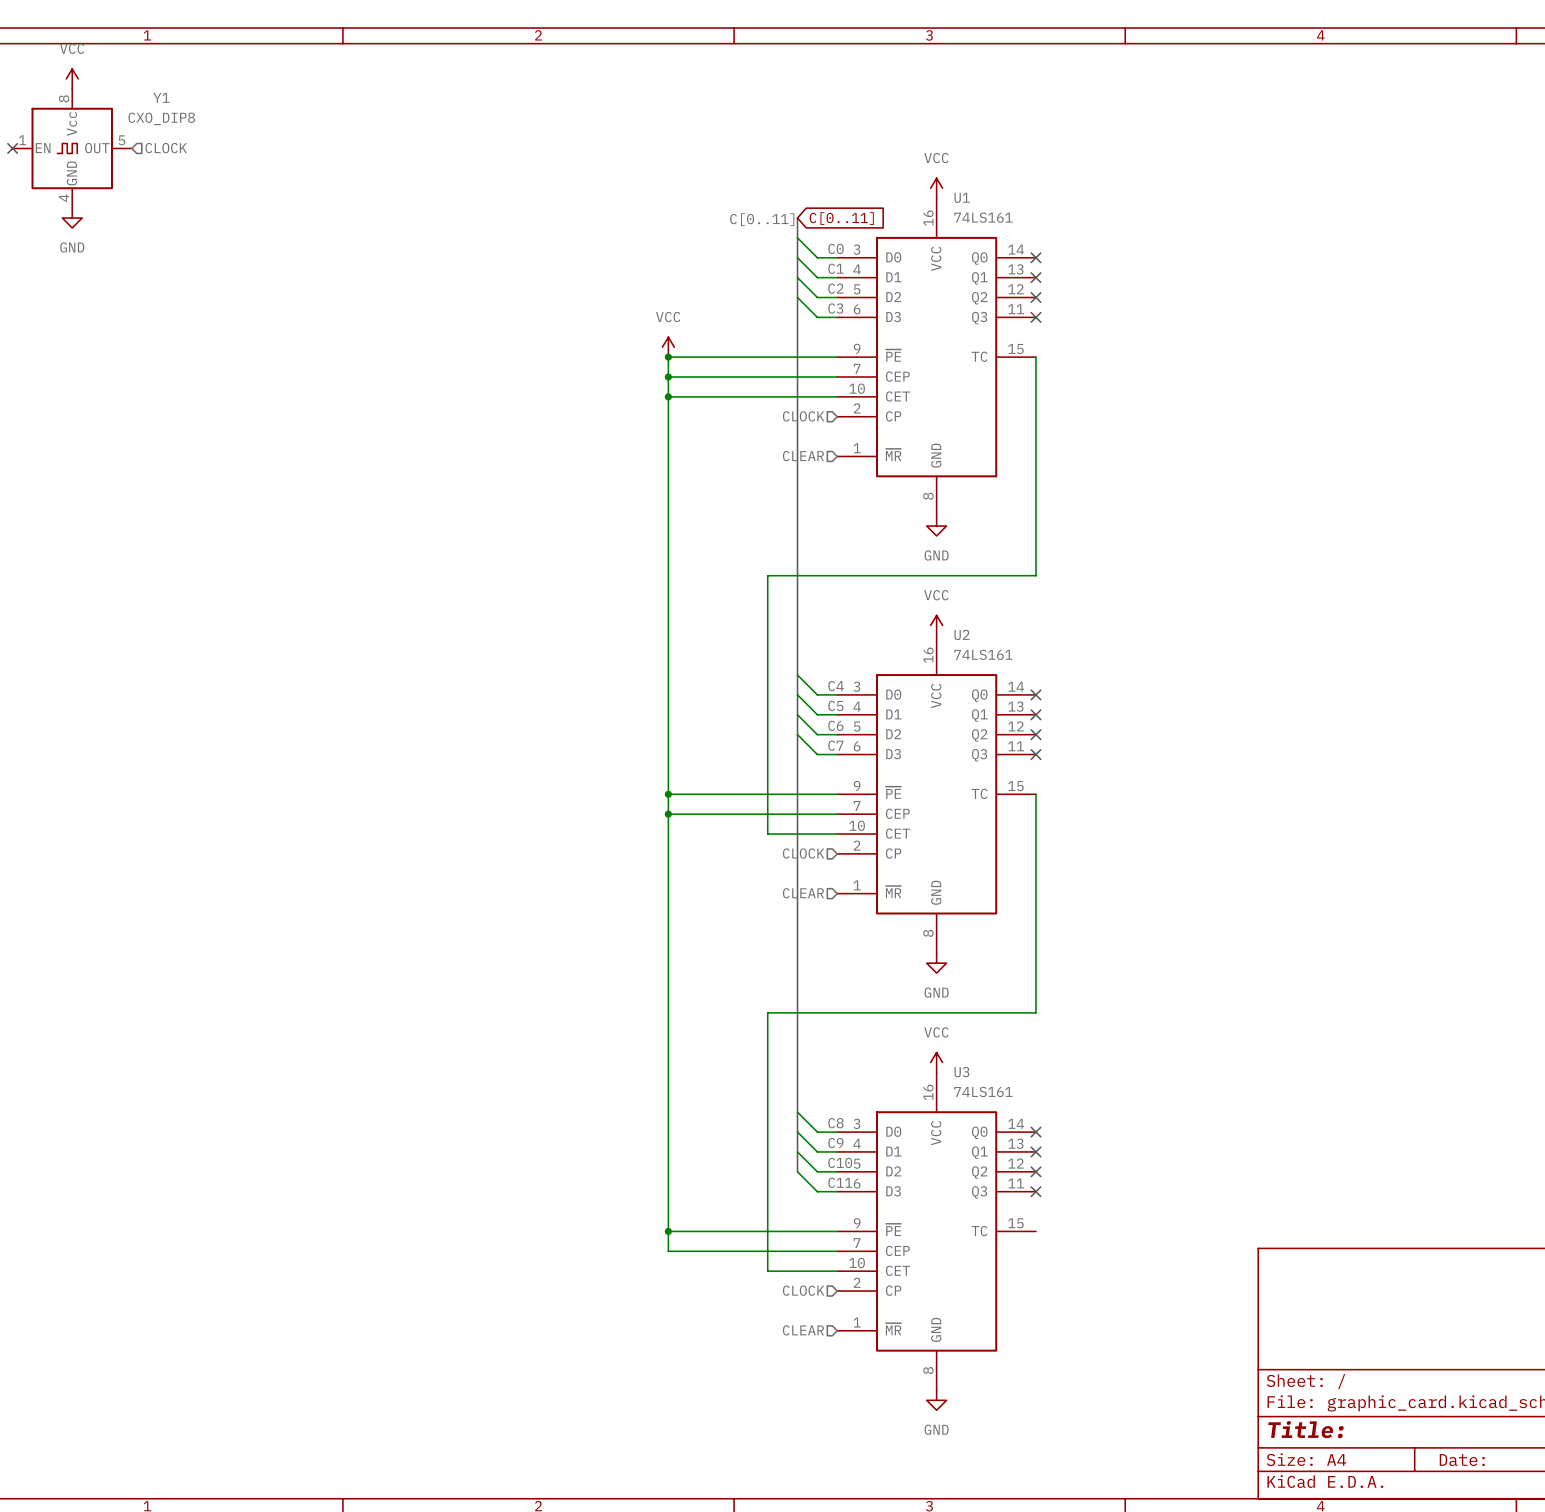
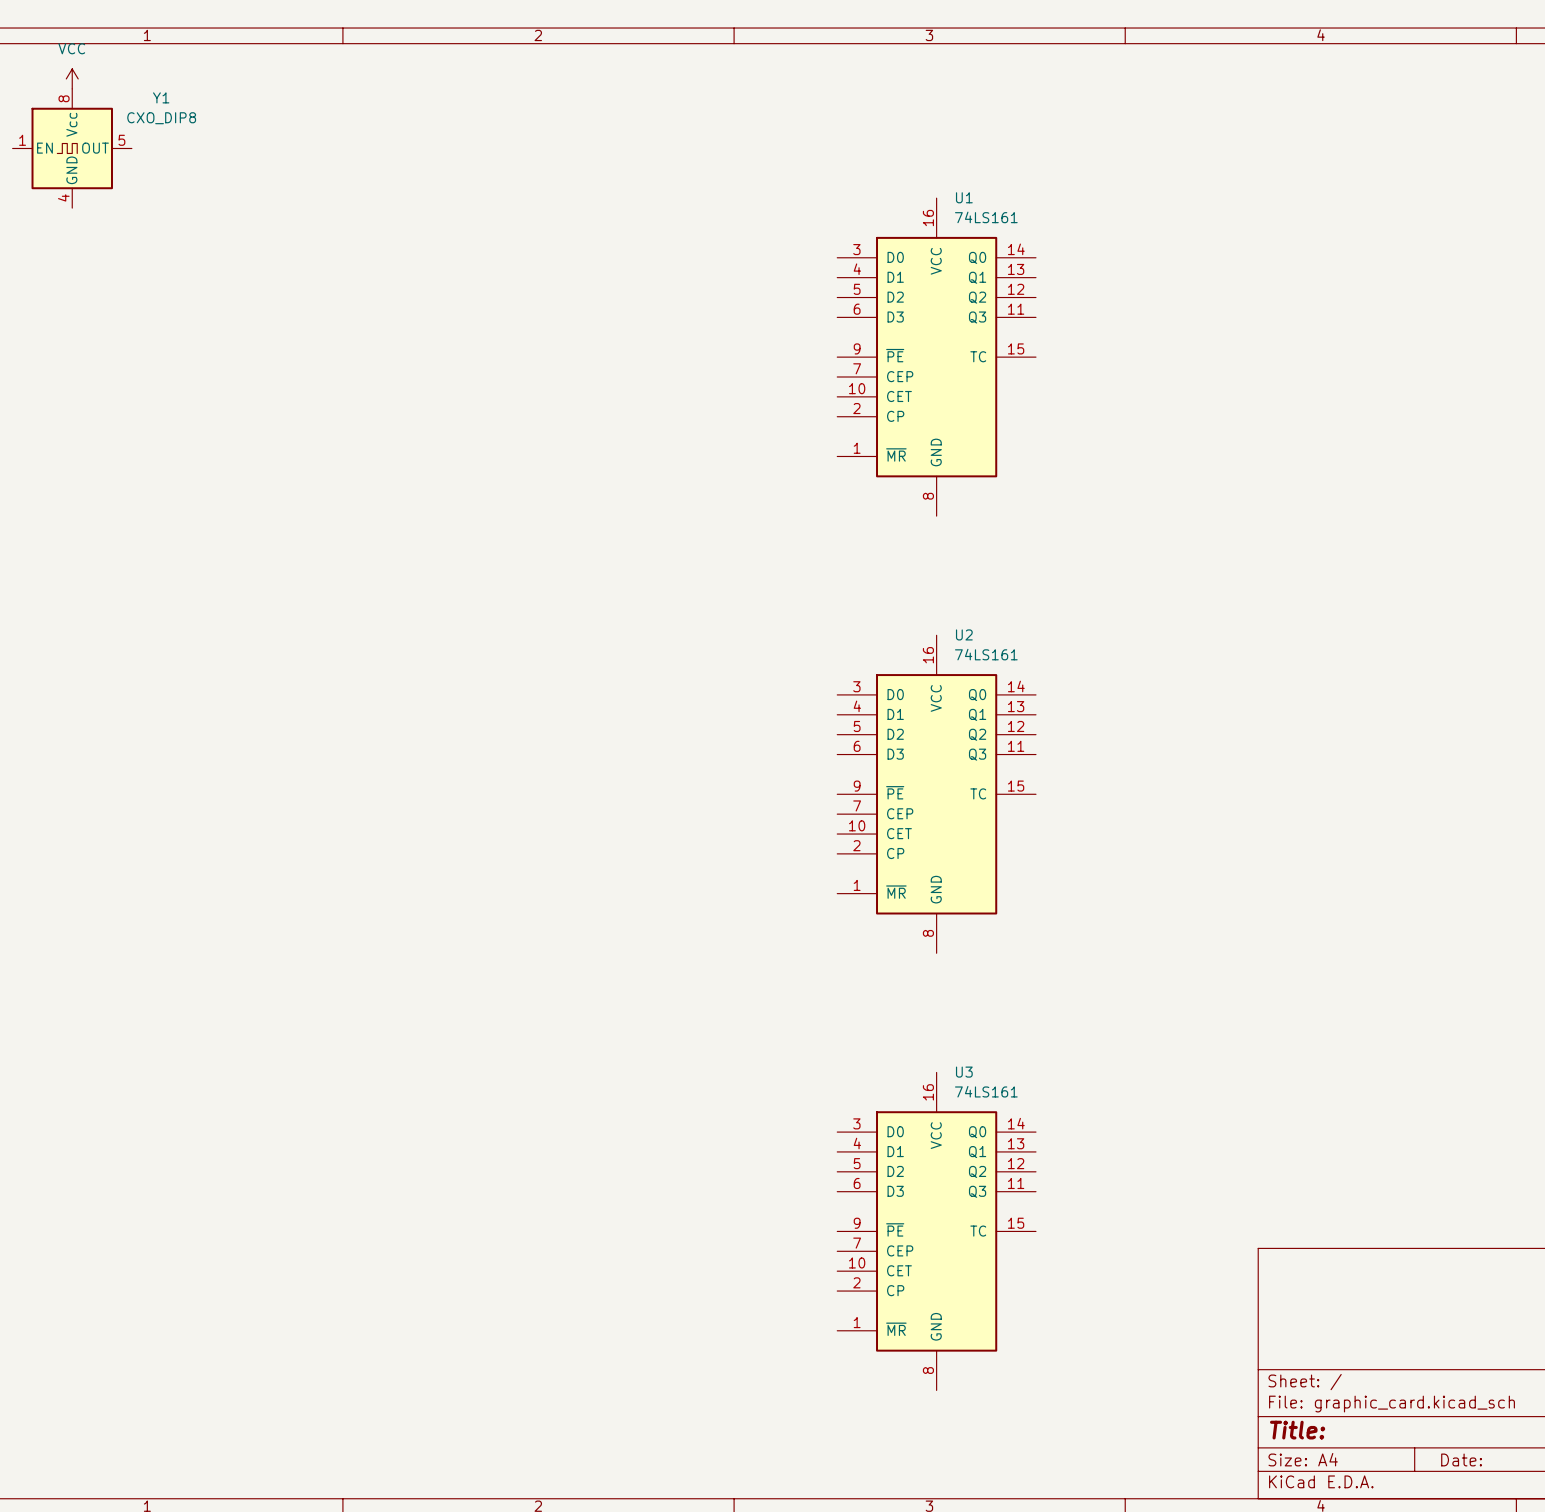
no-connect mark: (12, 148) -> none
hierarchical label: CLOCK (166, 148) -> none
power symbol: VCC (936, 188) -> none
power symbol: GND (72, 218) -> none
bus: (797, 218) (797, 1171) -> none
global label: C[0..11] (841, 218) -> none
label: C[0..11] (762, 219) -> none
wire: (797, 237) (817, 257) (837, 257) -> none
label: C0 (835, 248) -> none
wire: (797, 257) (817, 277) (837, 277) -> none
no-connect mark: (1035, 257) -> none
label: C1 (836, 268) -> none
wire: (797, 277) (817, 297) (837, 297) -> none
no-connect mark: (1035, 277) -> none
label: C2 (835, 288) -> none
wire: (797, 297) (817, 317) (837, 317) -> none
no-connect mark: (1035, 297) -> none
label: C3 (835, 308) -> none
no-connect mark: (1035, 317) -> none
power symbol: VCC (668, 347) -> none
junction: (668, 357) -> none
wire: (837, 357) (668, 357) (668, 1251) (837, 1251) -> none
wire: (1035, 357) (1035, 575) (767, 575) (767, 834) (837, 834) -> none
wire: (668, 376) (837, 376) -> none
junction: (668, 376) -> none
wire: (668, 396) (837, 396) -> none
junction: (668, 396) -> none
hierarchical label: CLOCK (803, 416) -> none
hierarchical label: CLEAR (803, 456) -> none
power symbol: GND (936, 526) -> none
power symbol: VCC (936, 625) -> none
wire: (797, 675) (817, 694) (837, 694) -> none
label: C4 (836, 686) -> none
wire: (797, 694) (817, 714) (837, 714) -> none
no-connect mark: (1035, 694) -> none
label: C5 (835, 705) -> none
wire: (797, 714) (817, 734) (837, 734) -> none
no-connect mark: (1035, 714) -> none
label: C6 (835, 725) -> none
wire: (797, 734) (817, 754) (837, 754) -> none
no-connect mark: (1035, 734) -> none
label: C7 (835, 745) -> none
no-connect mark: (1035, 754) -> none
wire: (668, 794) (837, 794) -> none
junction: (668, 794) -> none
wire: (1035, 794) (1035, 1012) (767, 1012) (767, 1271) (837, 1271) -> none
wire: (668, 814) (837, 814) -> none
junction: (668, 814) -> none
hierarchical label: CLOCK (803, 853) -> none
hierarchical label: CLEAR (803, 893) -> none
power symbol: GND (936, 963) -> none
power symbol: VCC (936, 1062) -> none
wire: (797, 1112) (817, 1132) (837, 1132) -> none
label: C8 (835, 1123) -> none
wire: (797, 1132) (817, 1151) (837, 1151) -> none
no-connect mark: (1035, 1132) -> none
label: C9 (835, 1143) -> none
wire: (797, 1151) (817, 1171) (837, 1171) -> none
no-connect mark: (1035, 1151) -> none
label: C10 (840, 1162) -> none
wire: (797, 1171) (817, 1191) (837, 1191) -> none
no-connect mark: (1035, 1171) -> none
label: C11 (840, 1182) -> none
no-connect mark: (1035, 1191) -> none
wire: (668, 1231) (837, 1231) -> none
junction: (668, 1231) -> none
hierarchical label: CLOCK (803, 1290) -> none
hierarchical label: CLEAR (803, 1330) -> none
power symbol: GND (936, 1400) -> none

